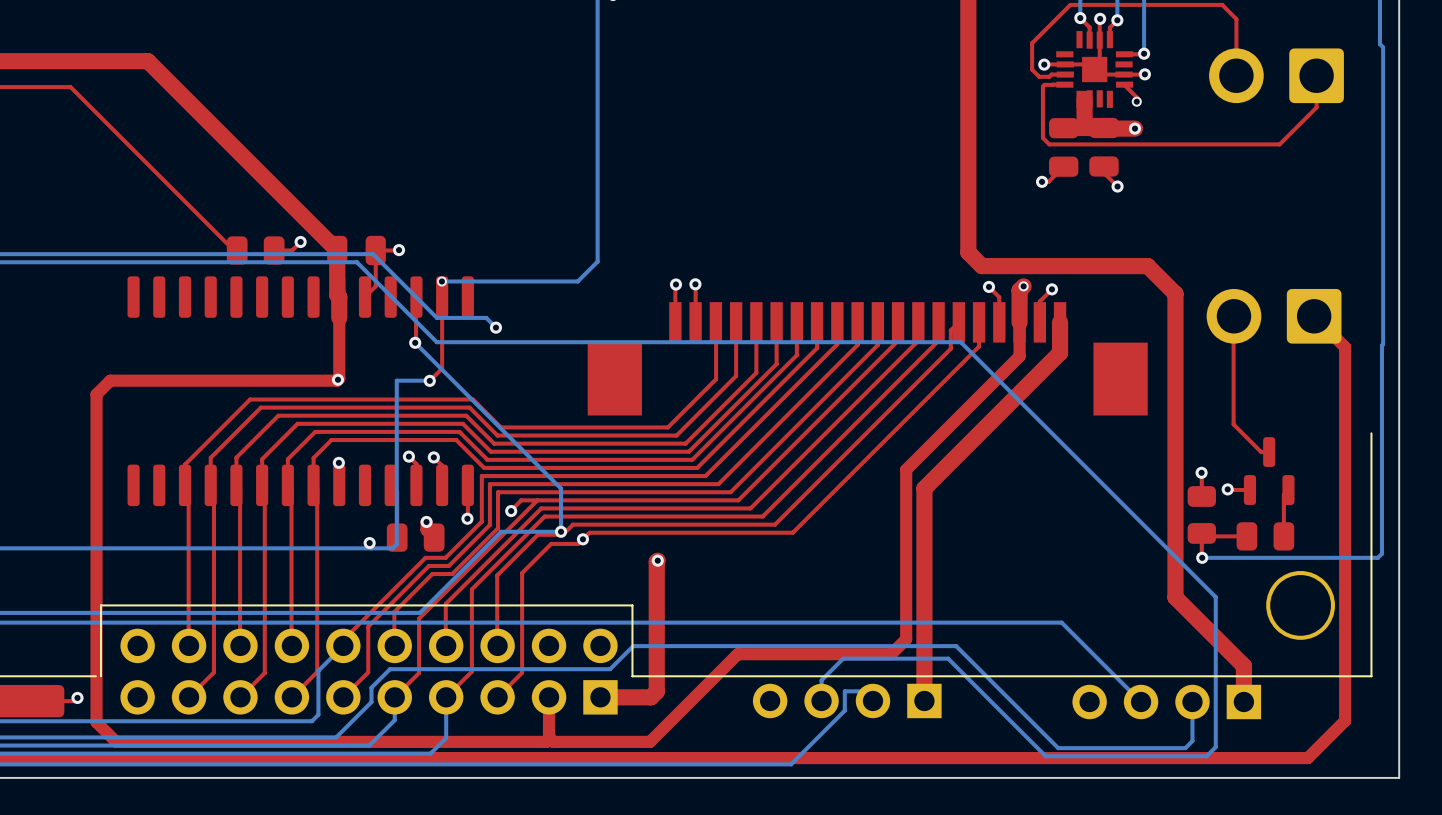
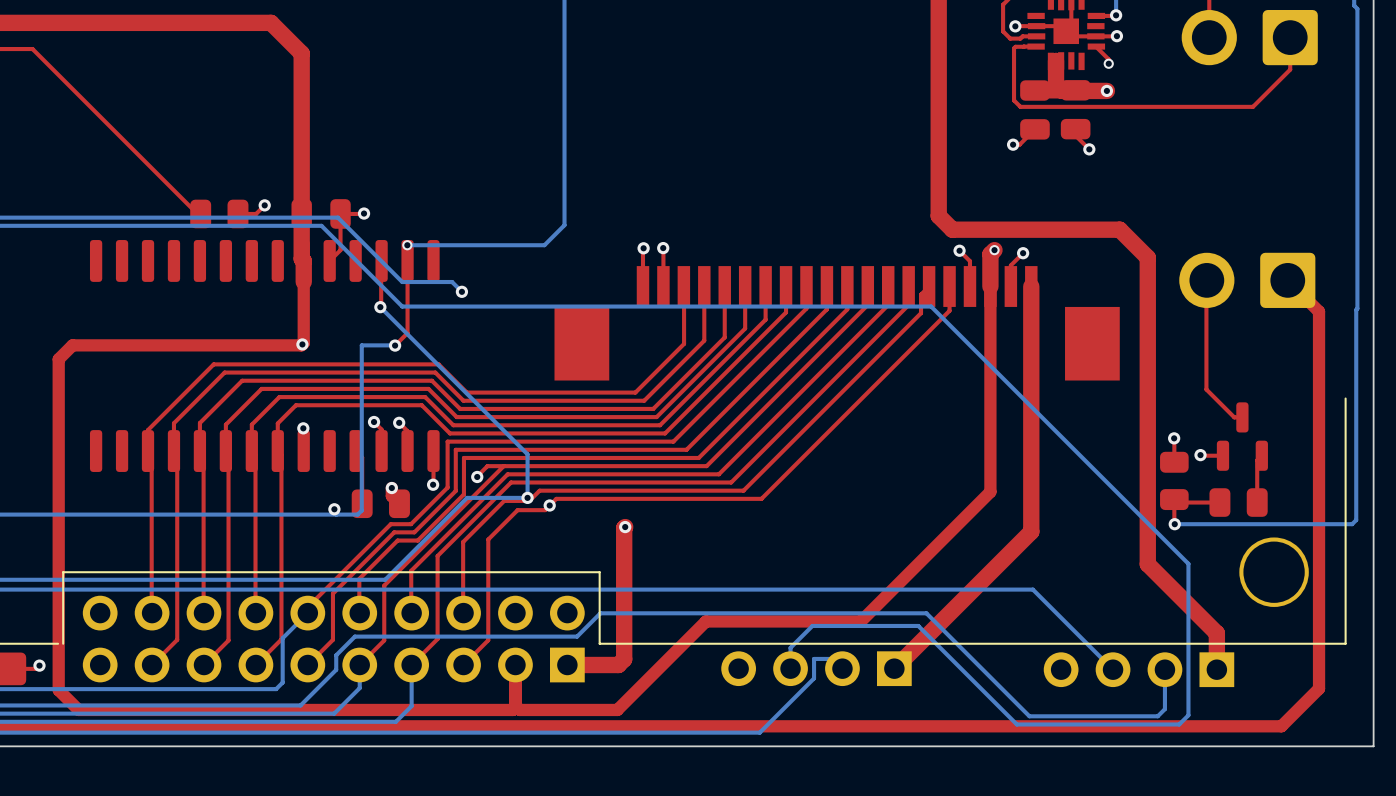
top track: (147, 61) (337, 250) -> (110, 22) (271, 22) (301, 53) (301, 213)
top track: (1060, 352) (924, 488) (924, 700) -> (1031, 317) (1031, 531) (894, 668)
top track: (1019, 356) (906, 469) (906, 639) -> (990, 320) (990, 491) (875, 606)

